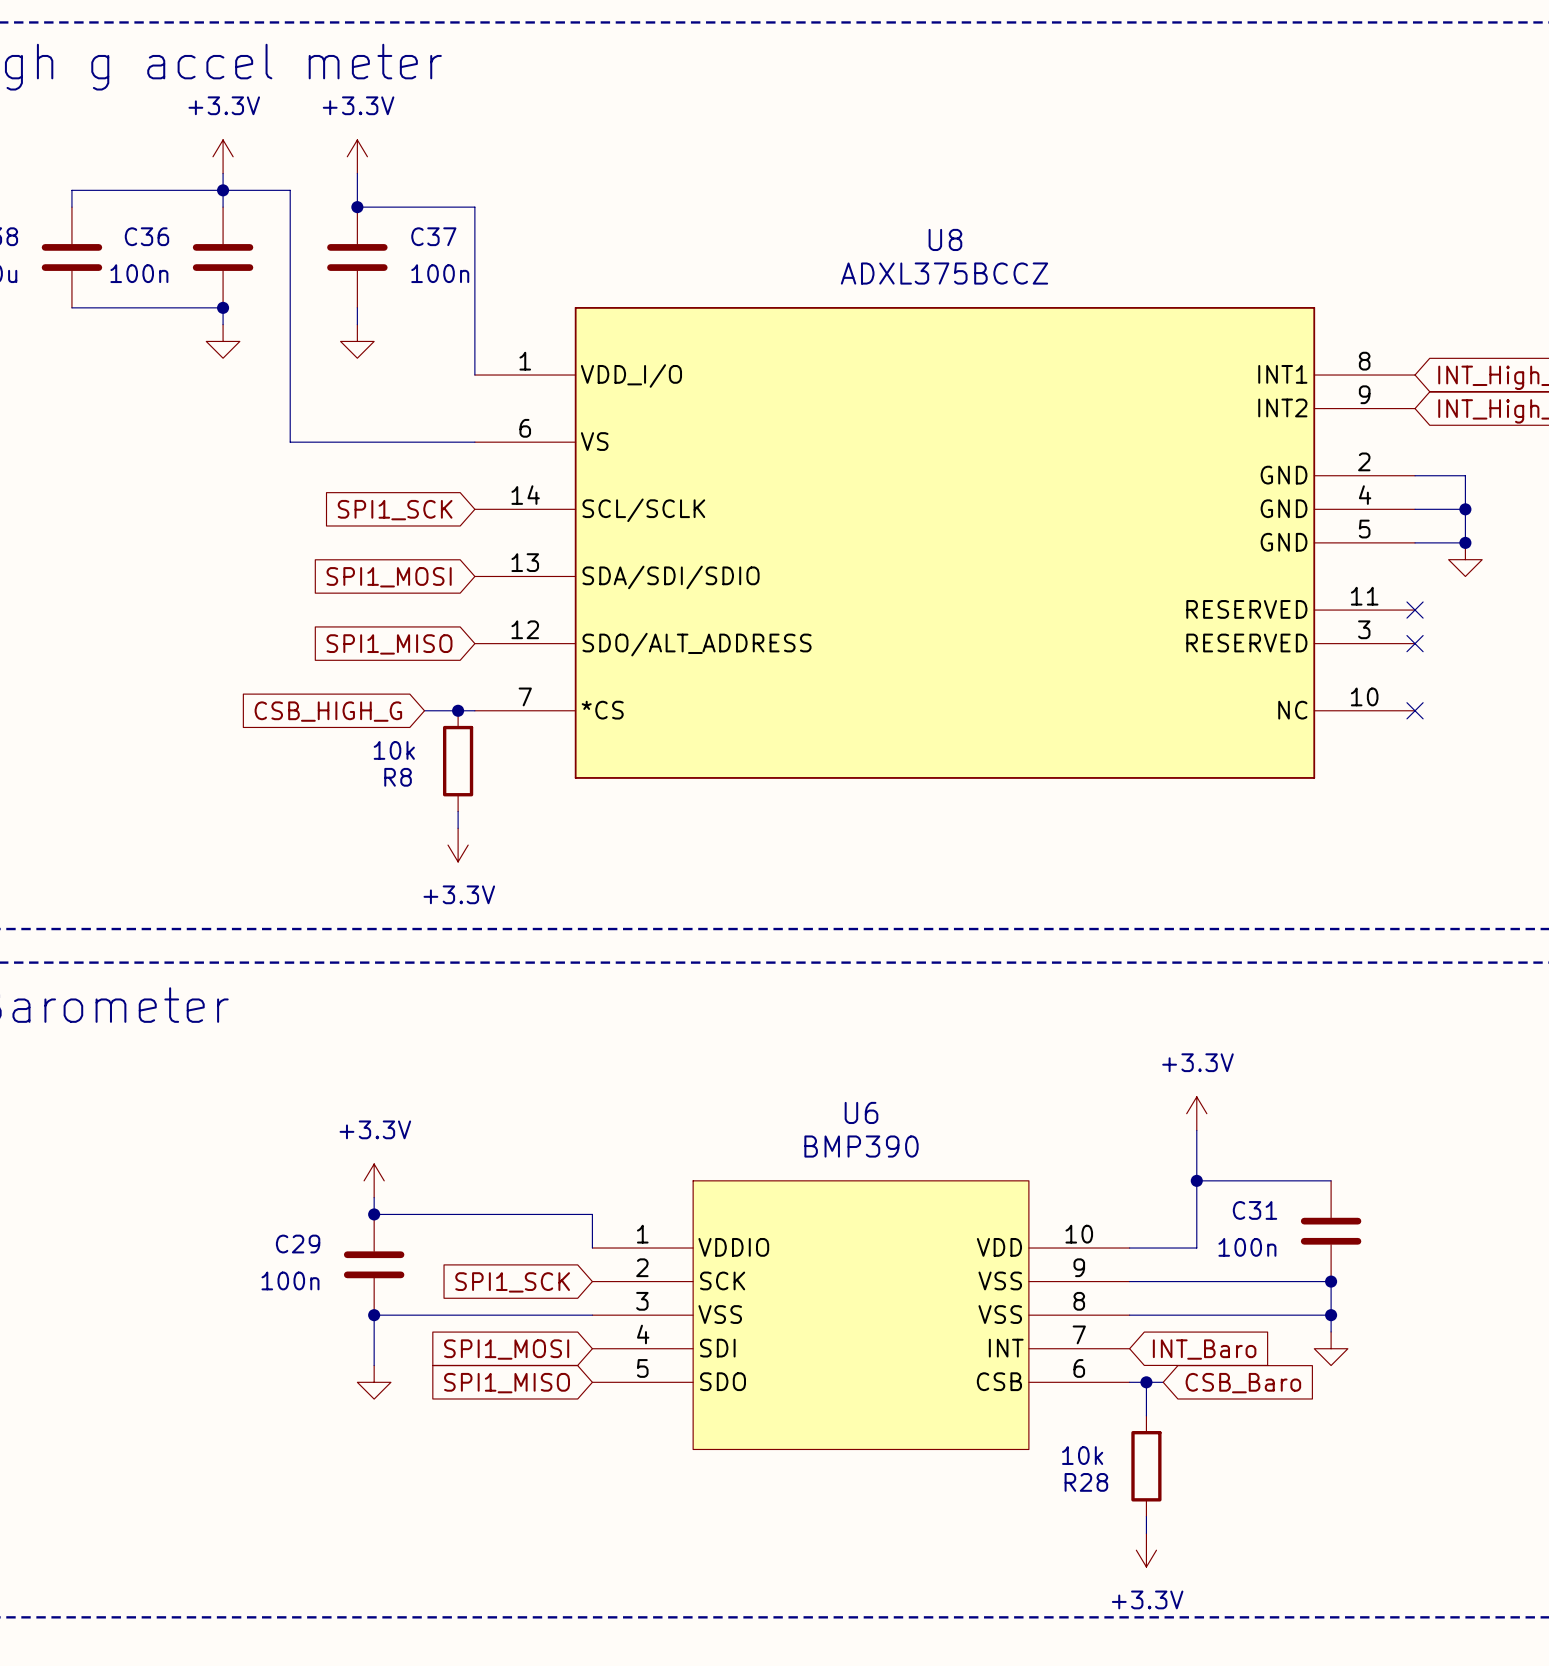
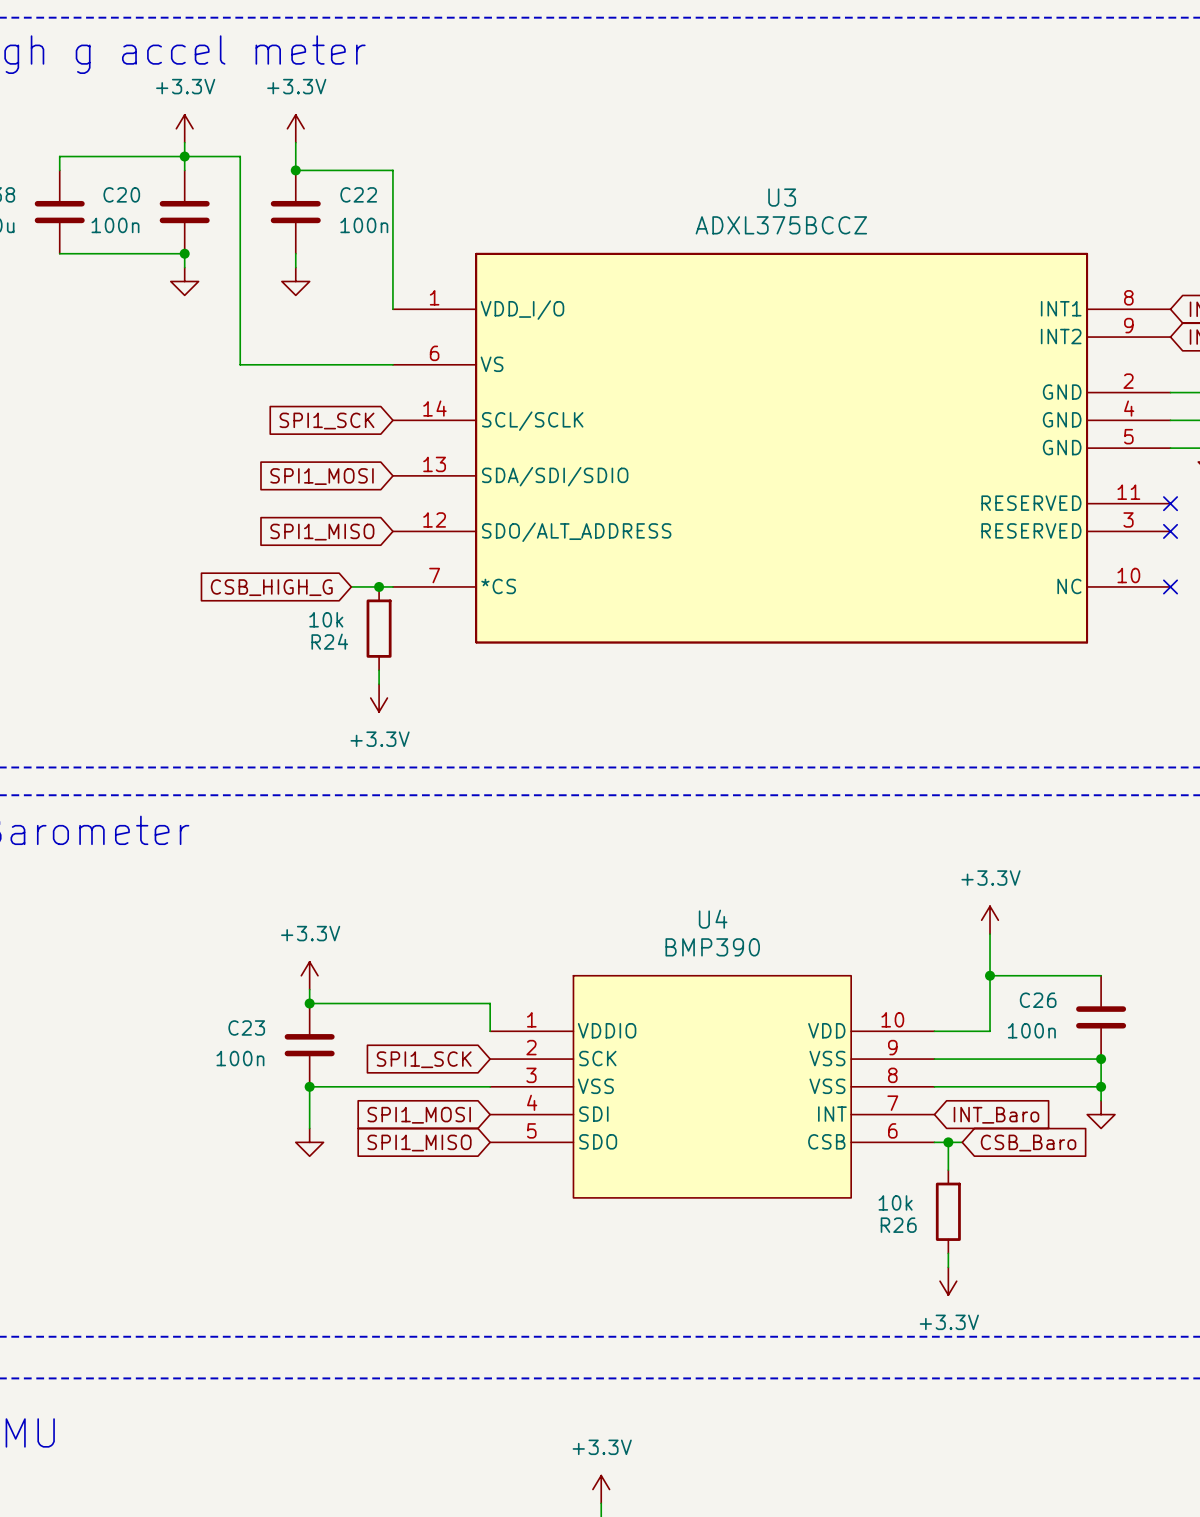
C36 name: C36 (146, 236) -> C20 (121, 194)
C37 name: C37 (433, 236) -> C22 (358, 194)
U8 name: U8 (945, 239) -> U3 (782, 197)
R8 name: R8 (398, 777) -> R24 (329, 641)
U6 name: U6 (861, 1112) -> U4 (713, 919)
C31 name: C31 (1255, 1210) -> C26 (1038, 1000)
C29 name: C29 (298, 1244) -> C23 (246, 1027)
R28 name: R28 (1086, 1482) -> R26 (898, 1225)

